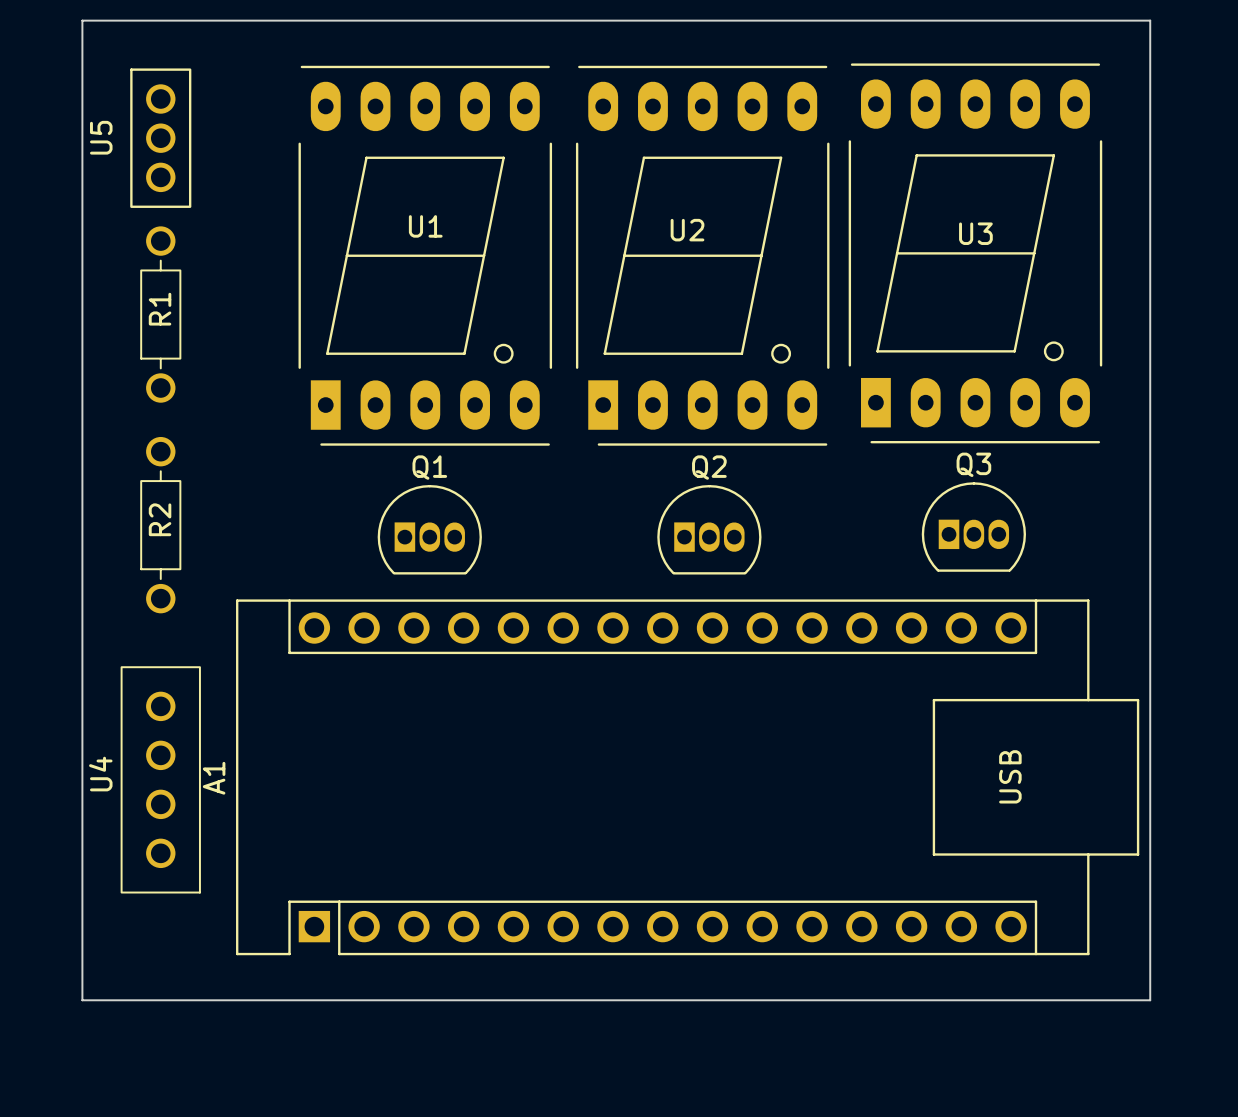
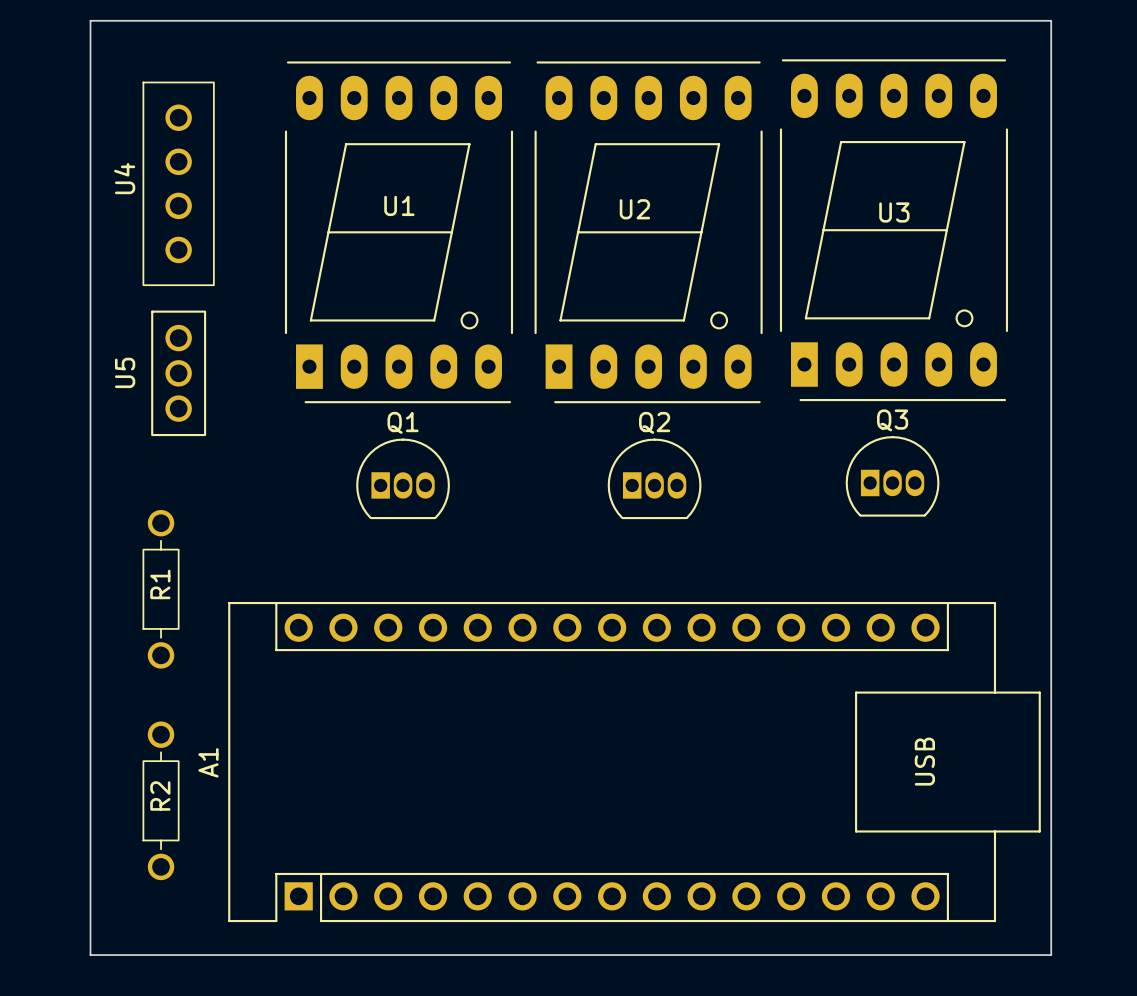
U5 position: (160, 138) -> (178, 373)
R1 position: (160, 314) -> (161, 589)
R2 position: (160, 525) -> (161, 800)
A1 position: (687, 777) -> (634, 762)
U4 position: (160, 779) -> (178, 183)
board edge: (82, 1000) (1150, 1000) -> (90, 902) (90, 955) (1051, 955) (1051, 902)

